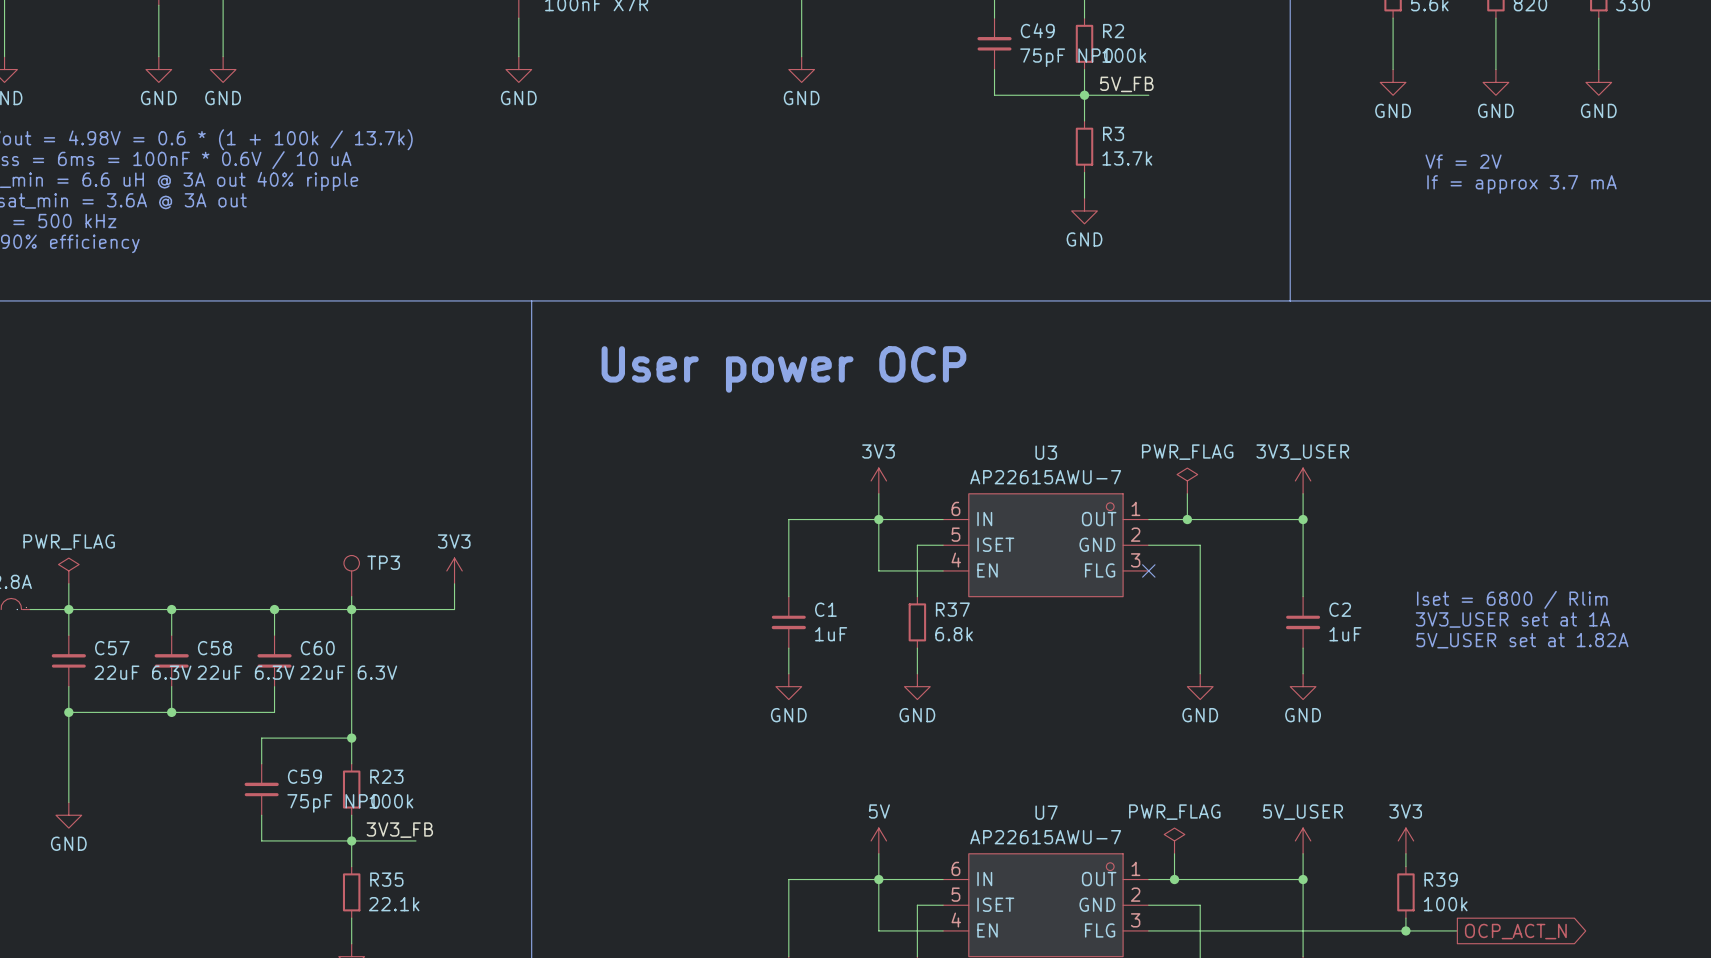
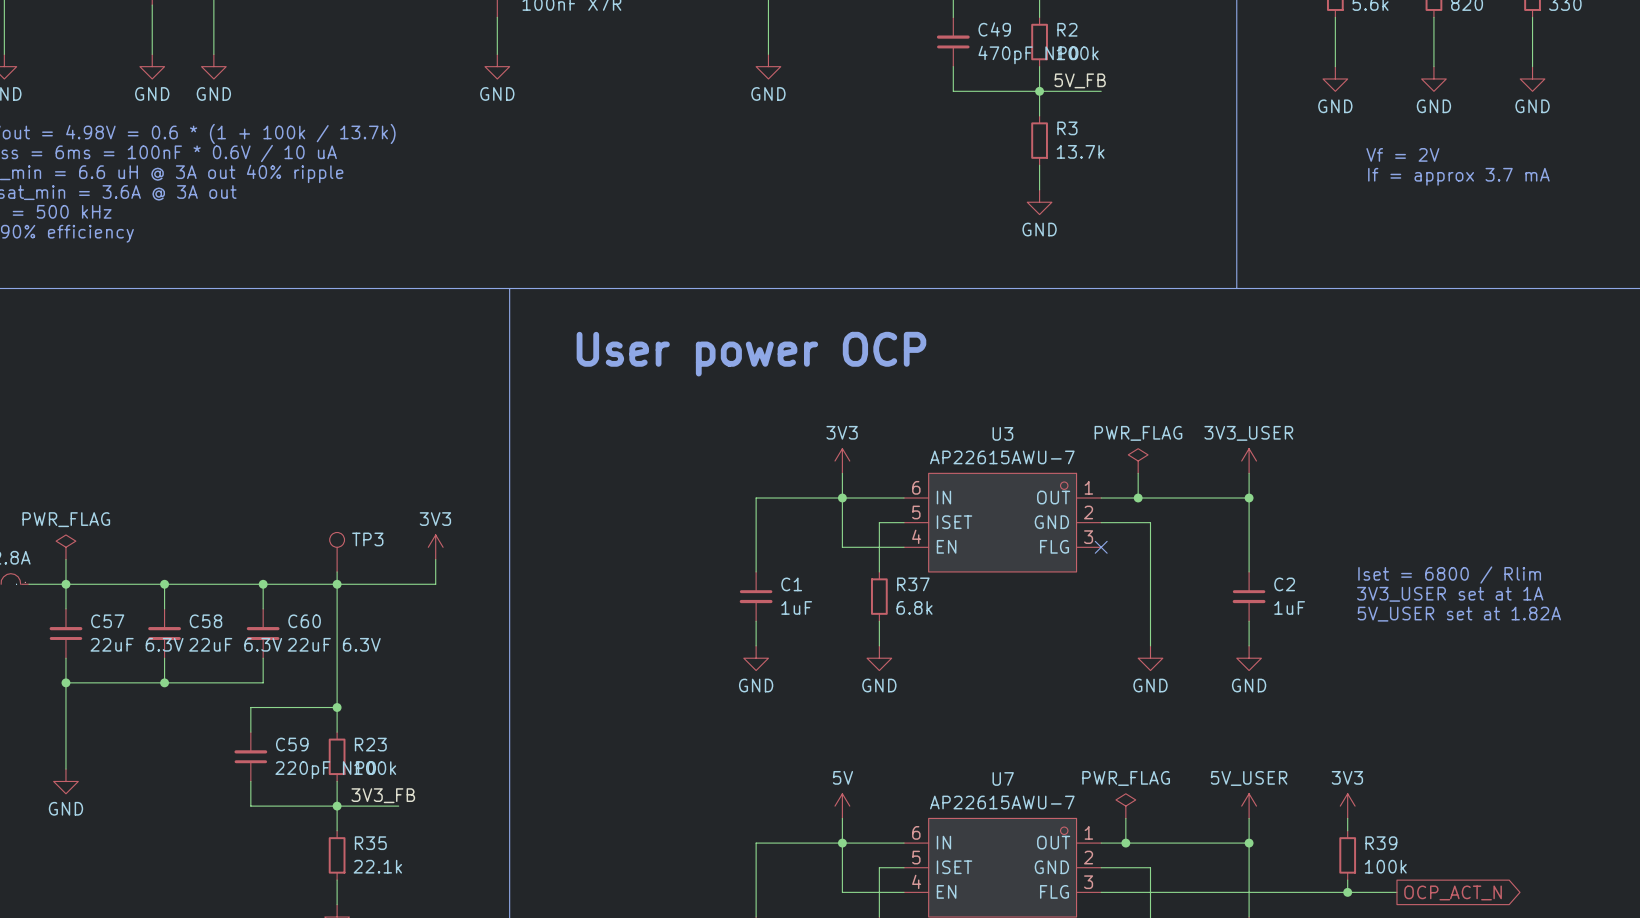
C49 value: 75pF NP0 (1066, 57) -> 470pF NP0 (1028, 55)
C59 value: 75pF NP0 (333, 803) -> 220pF NP0 (325, 770)

